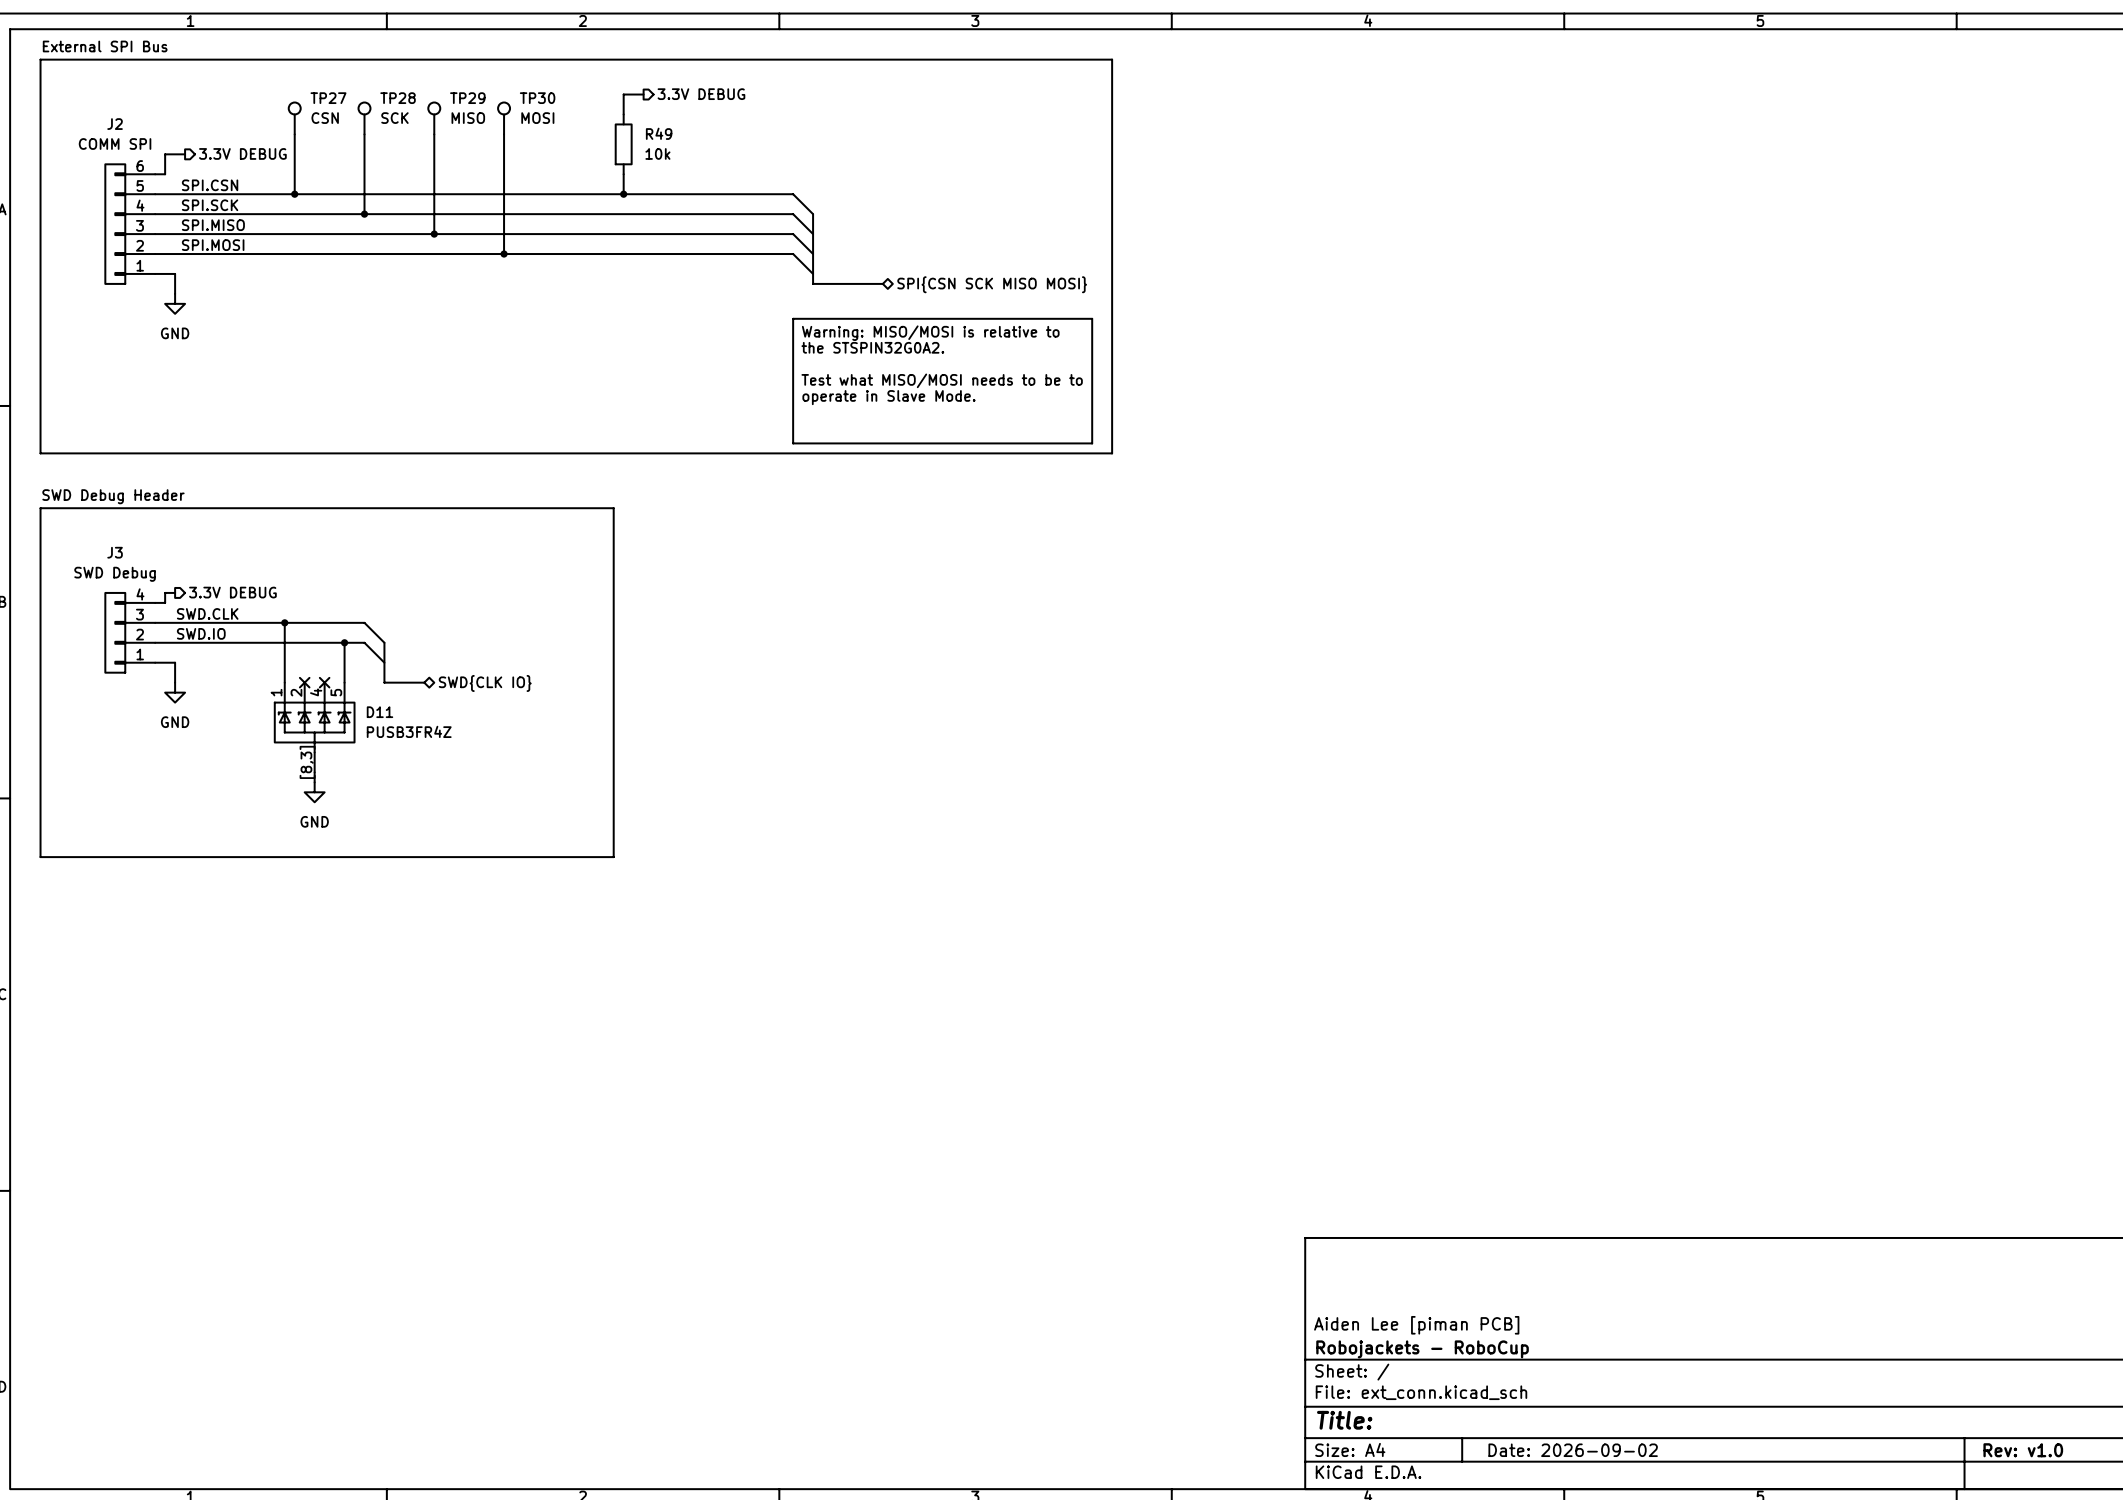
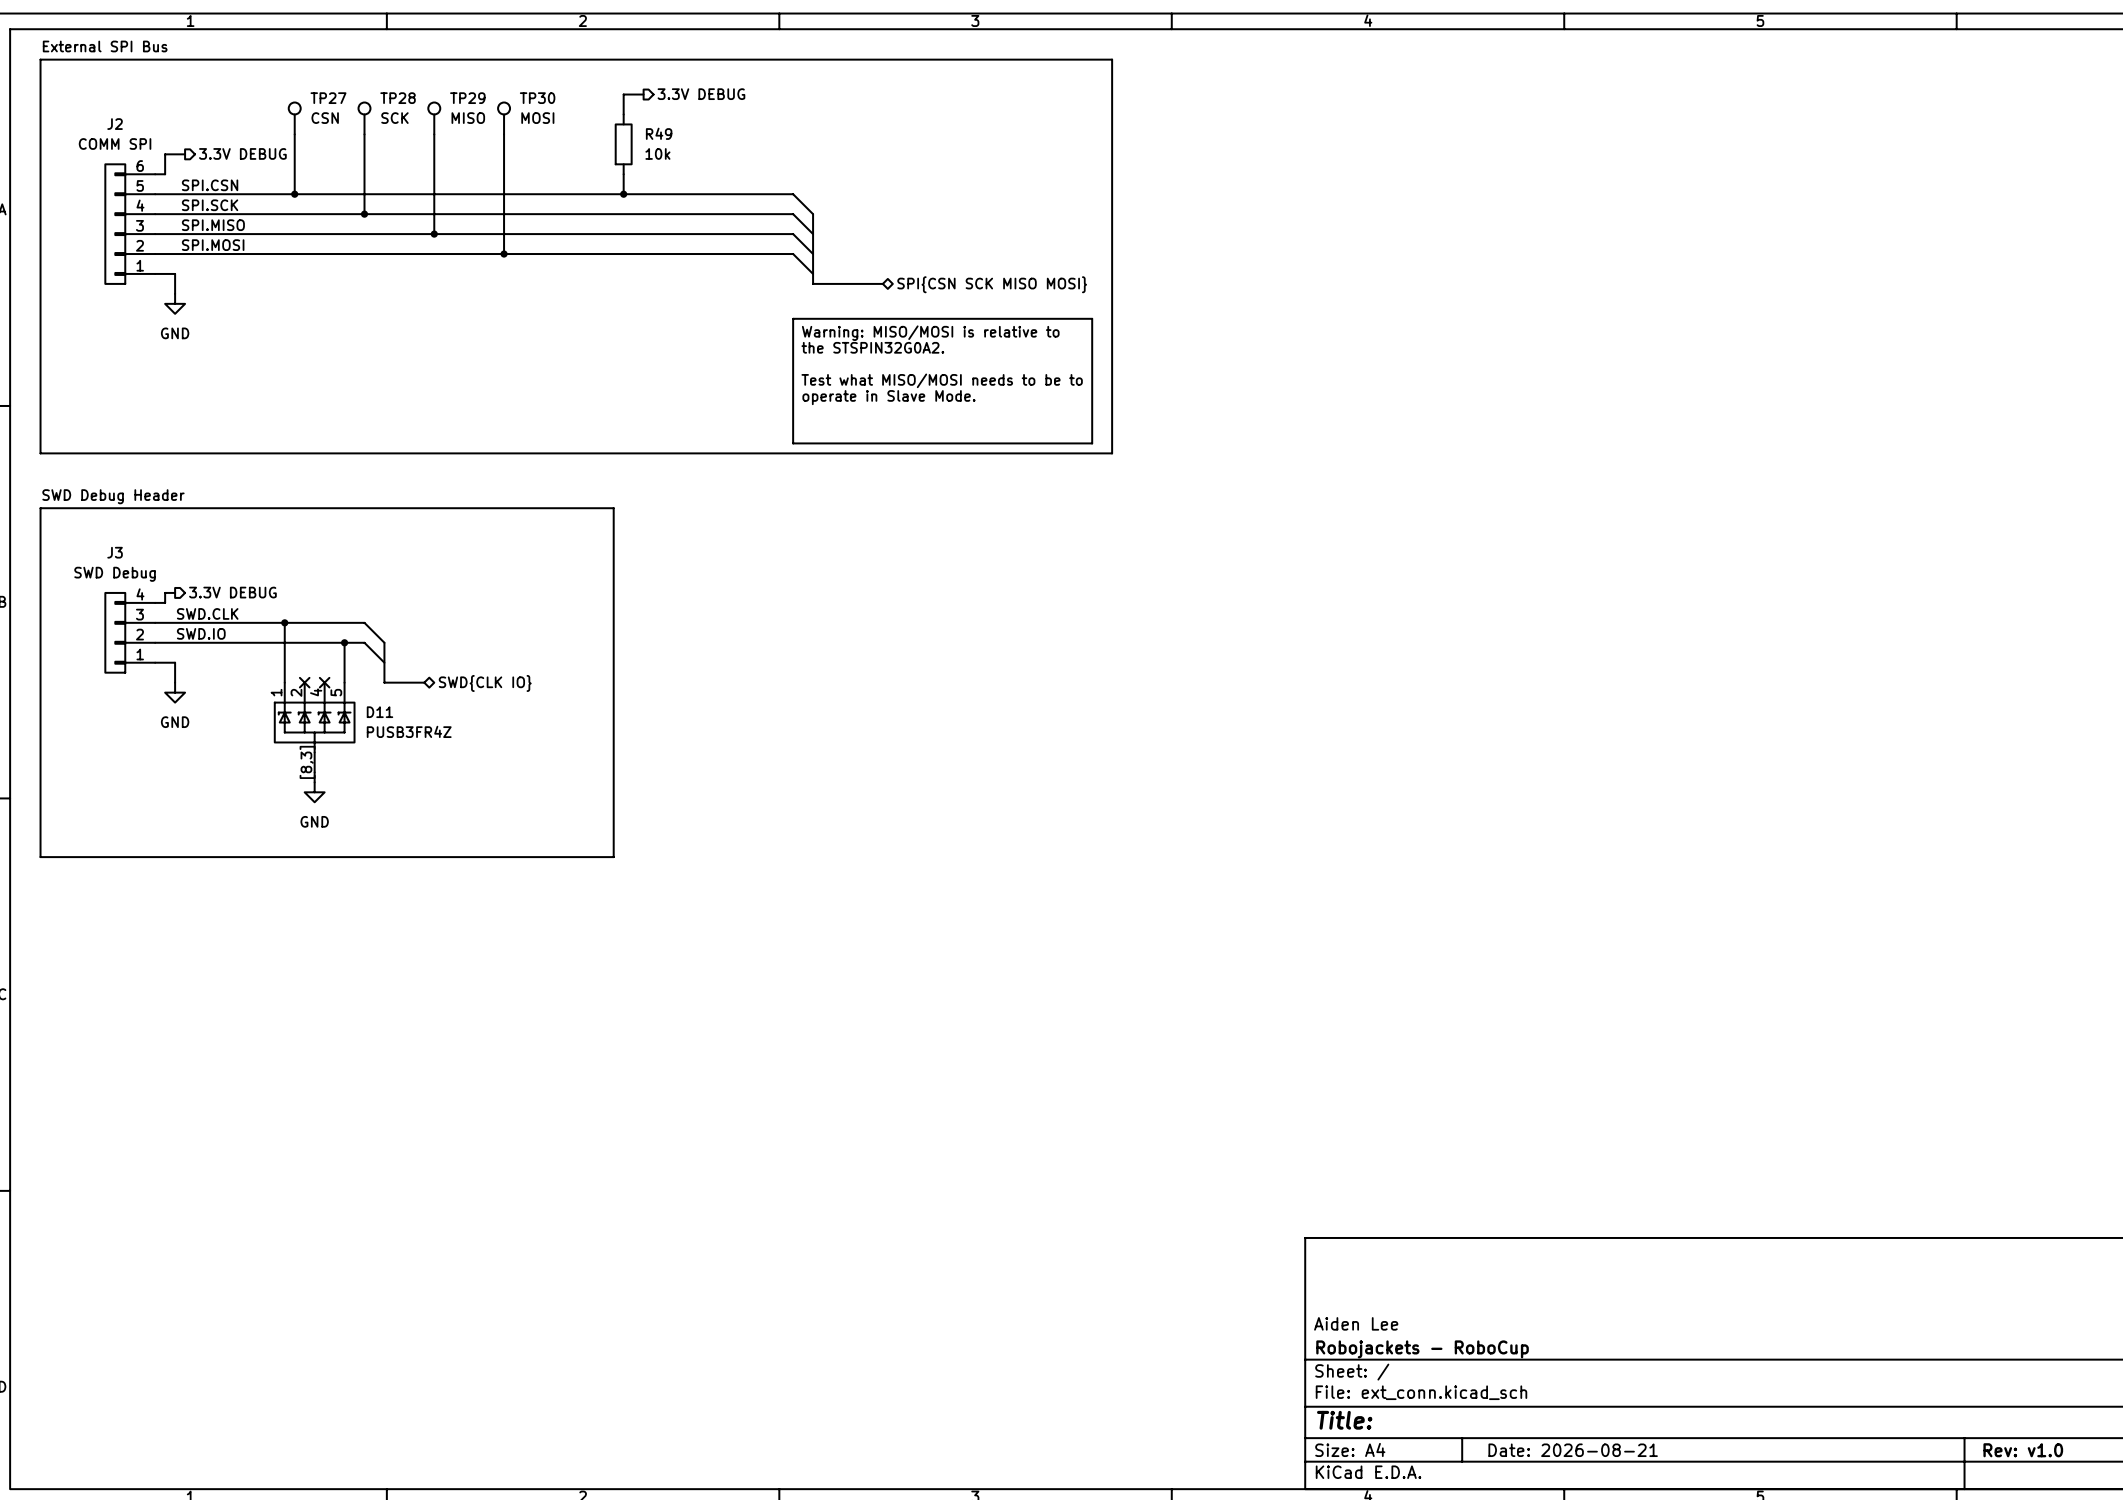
title block: Aiden Lee [piman PCB] (1416, 1325) -> Aiden Lee (1356, 1323)
title block: Date: 2026-09-02 (1573, 1450) -> Date: 2026-08-21 (1573, 1450)

